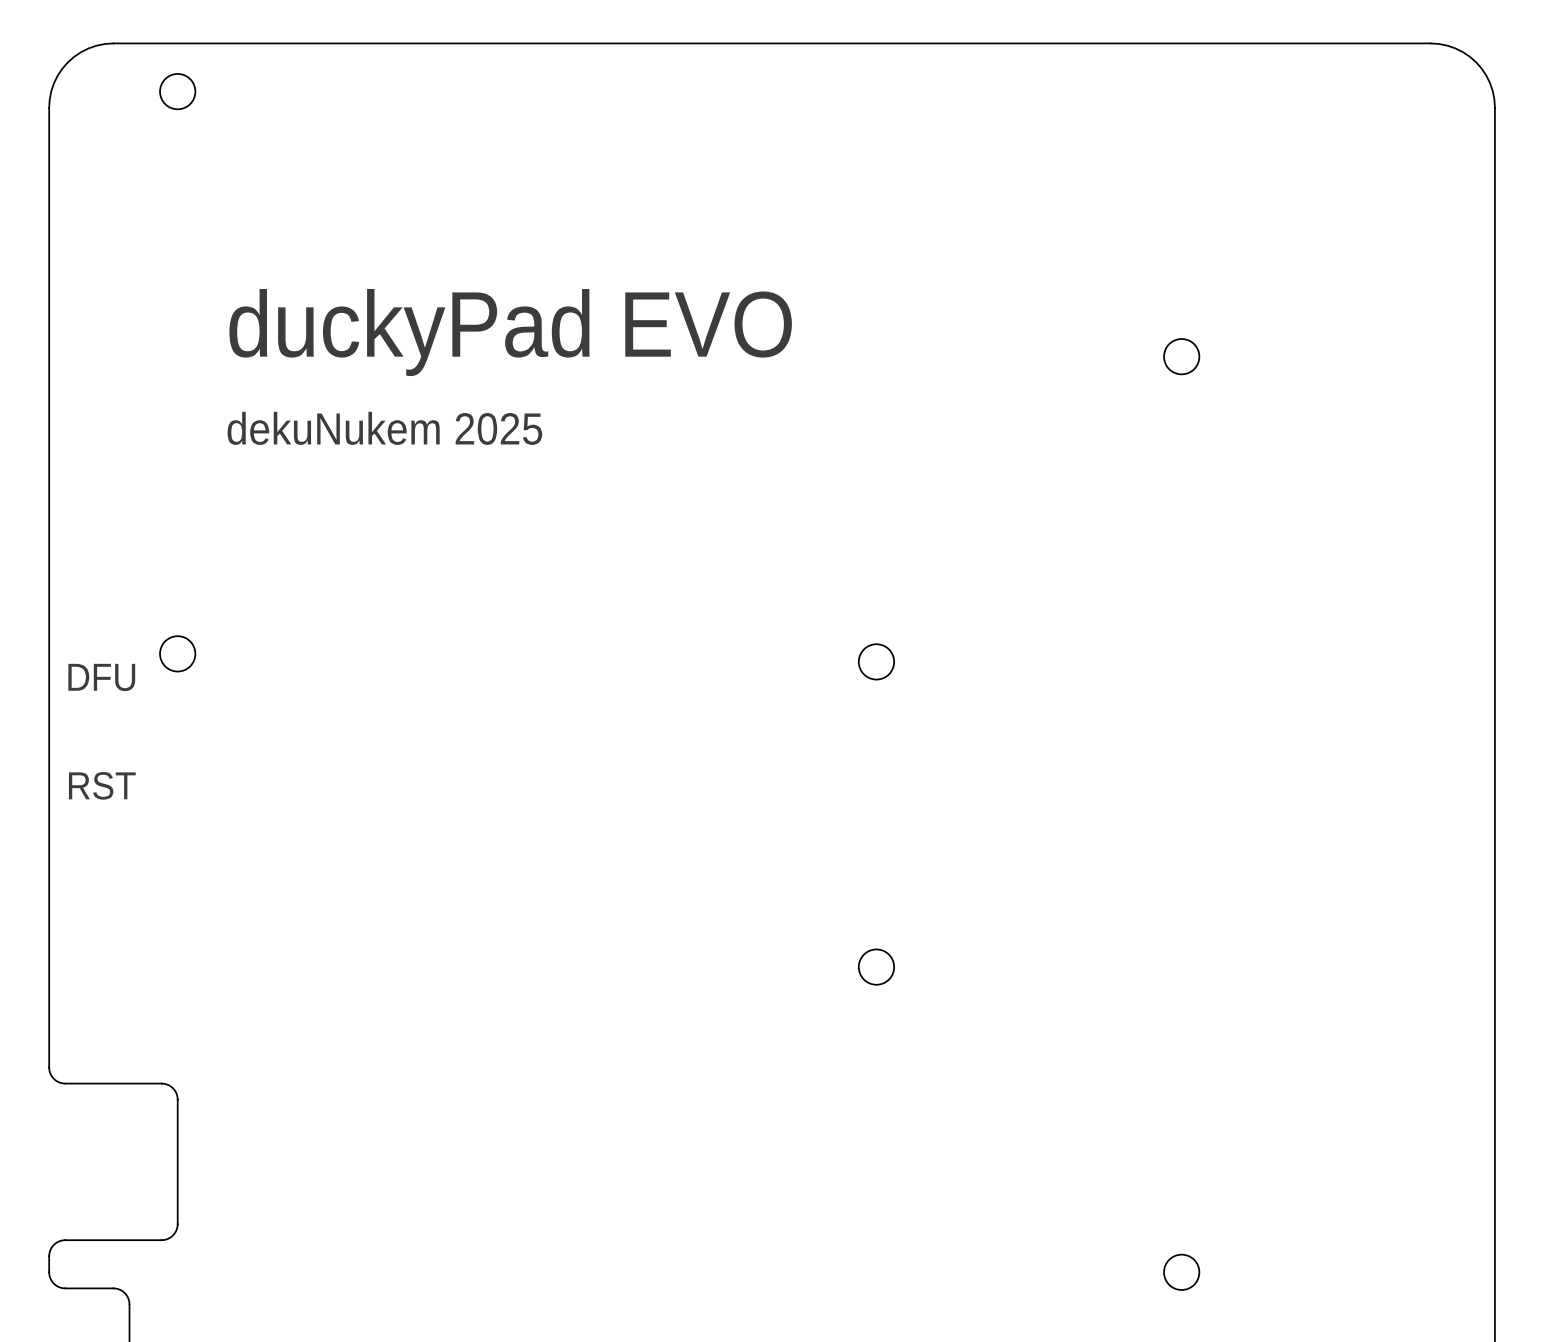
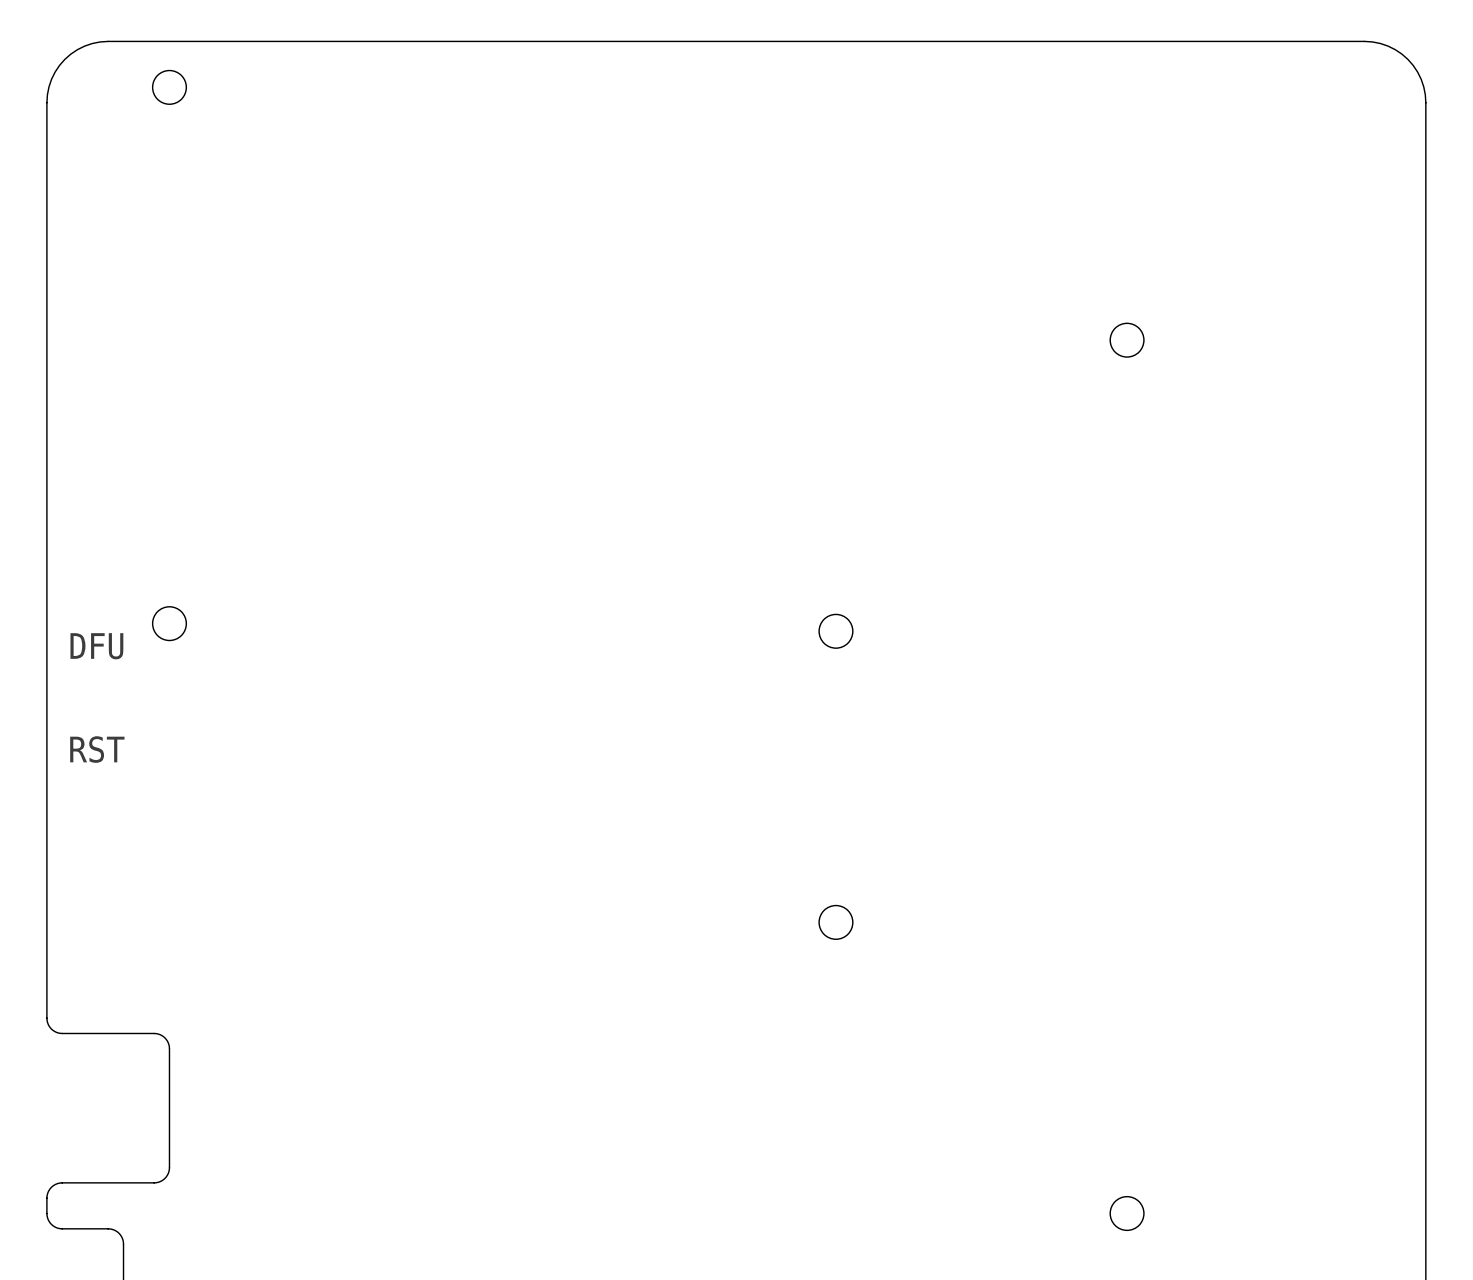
text: duckyPad EVO (510, 332) -> none
text: dekuNukem 2025 (384, 428) -> none

